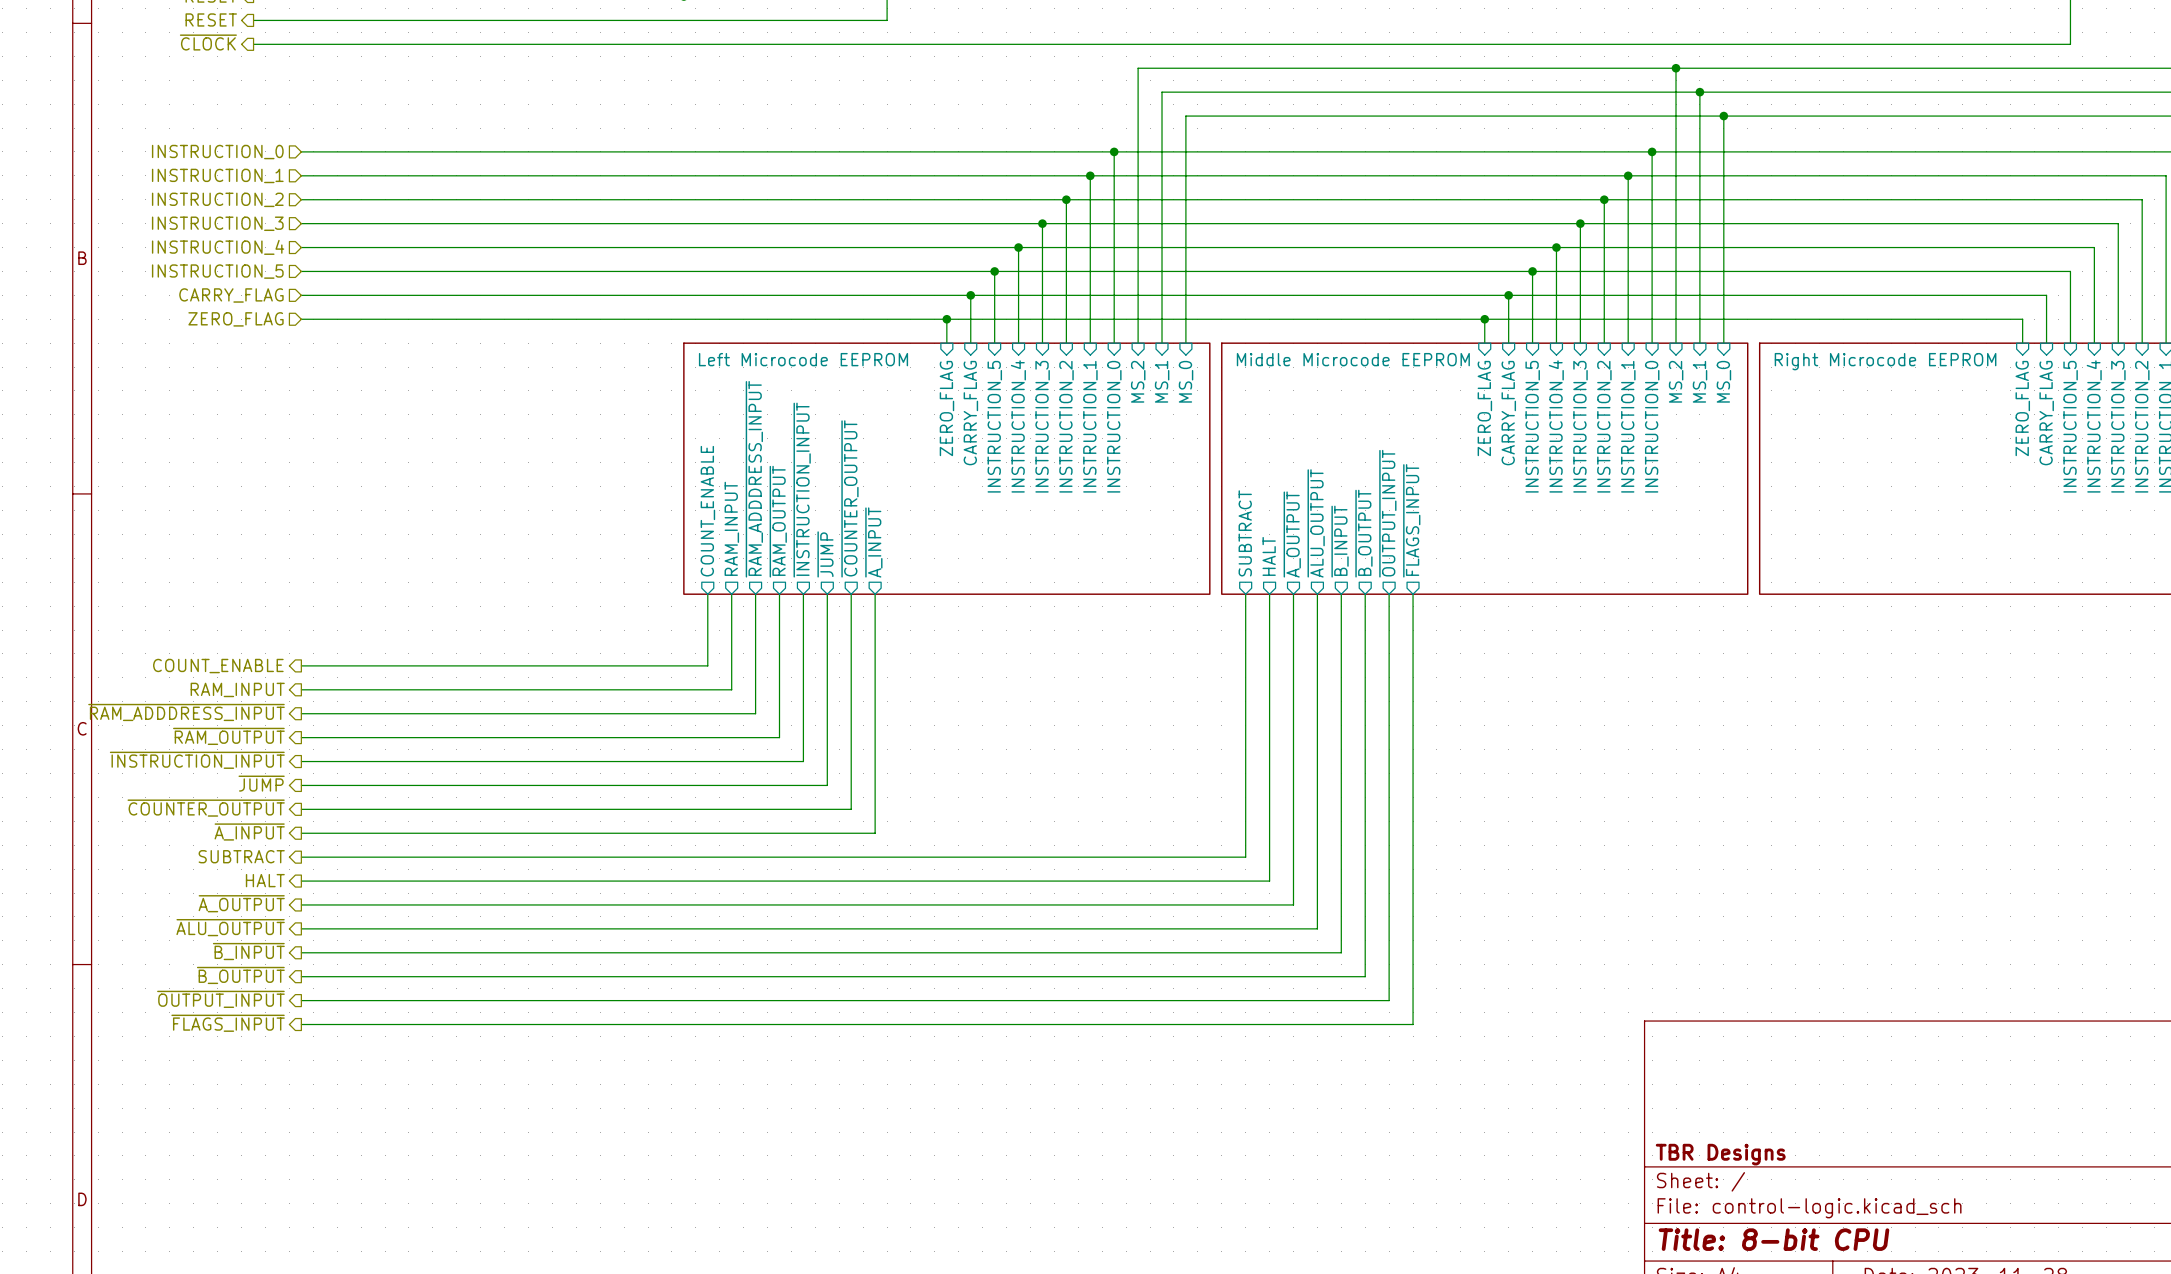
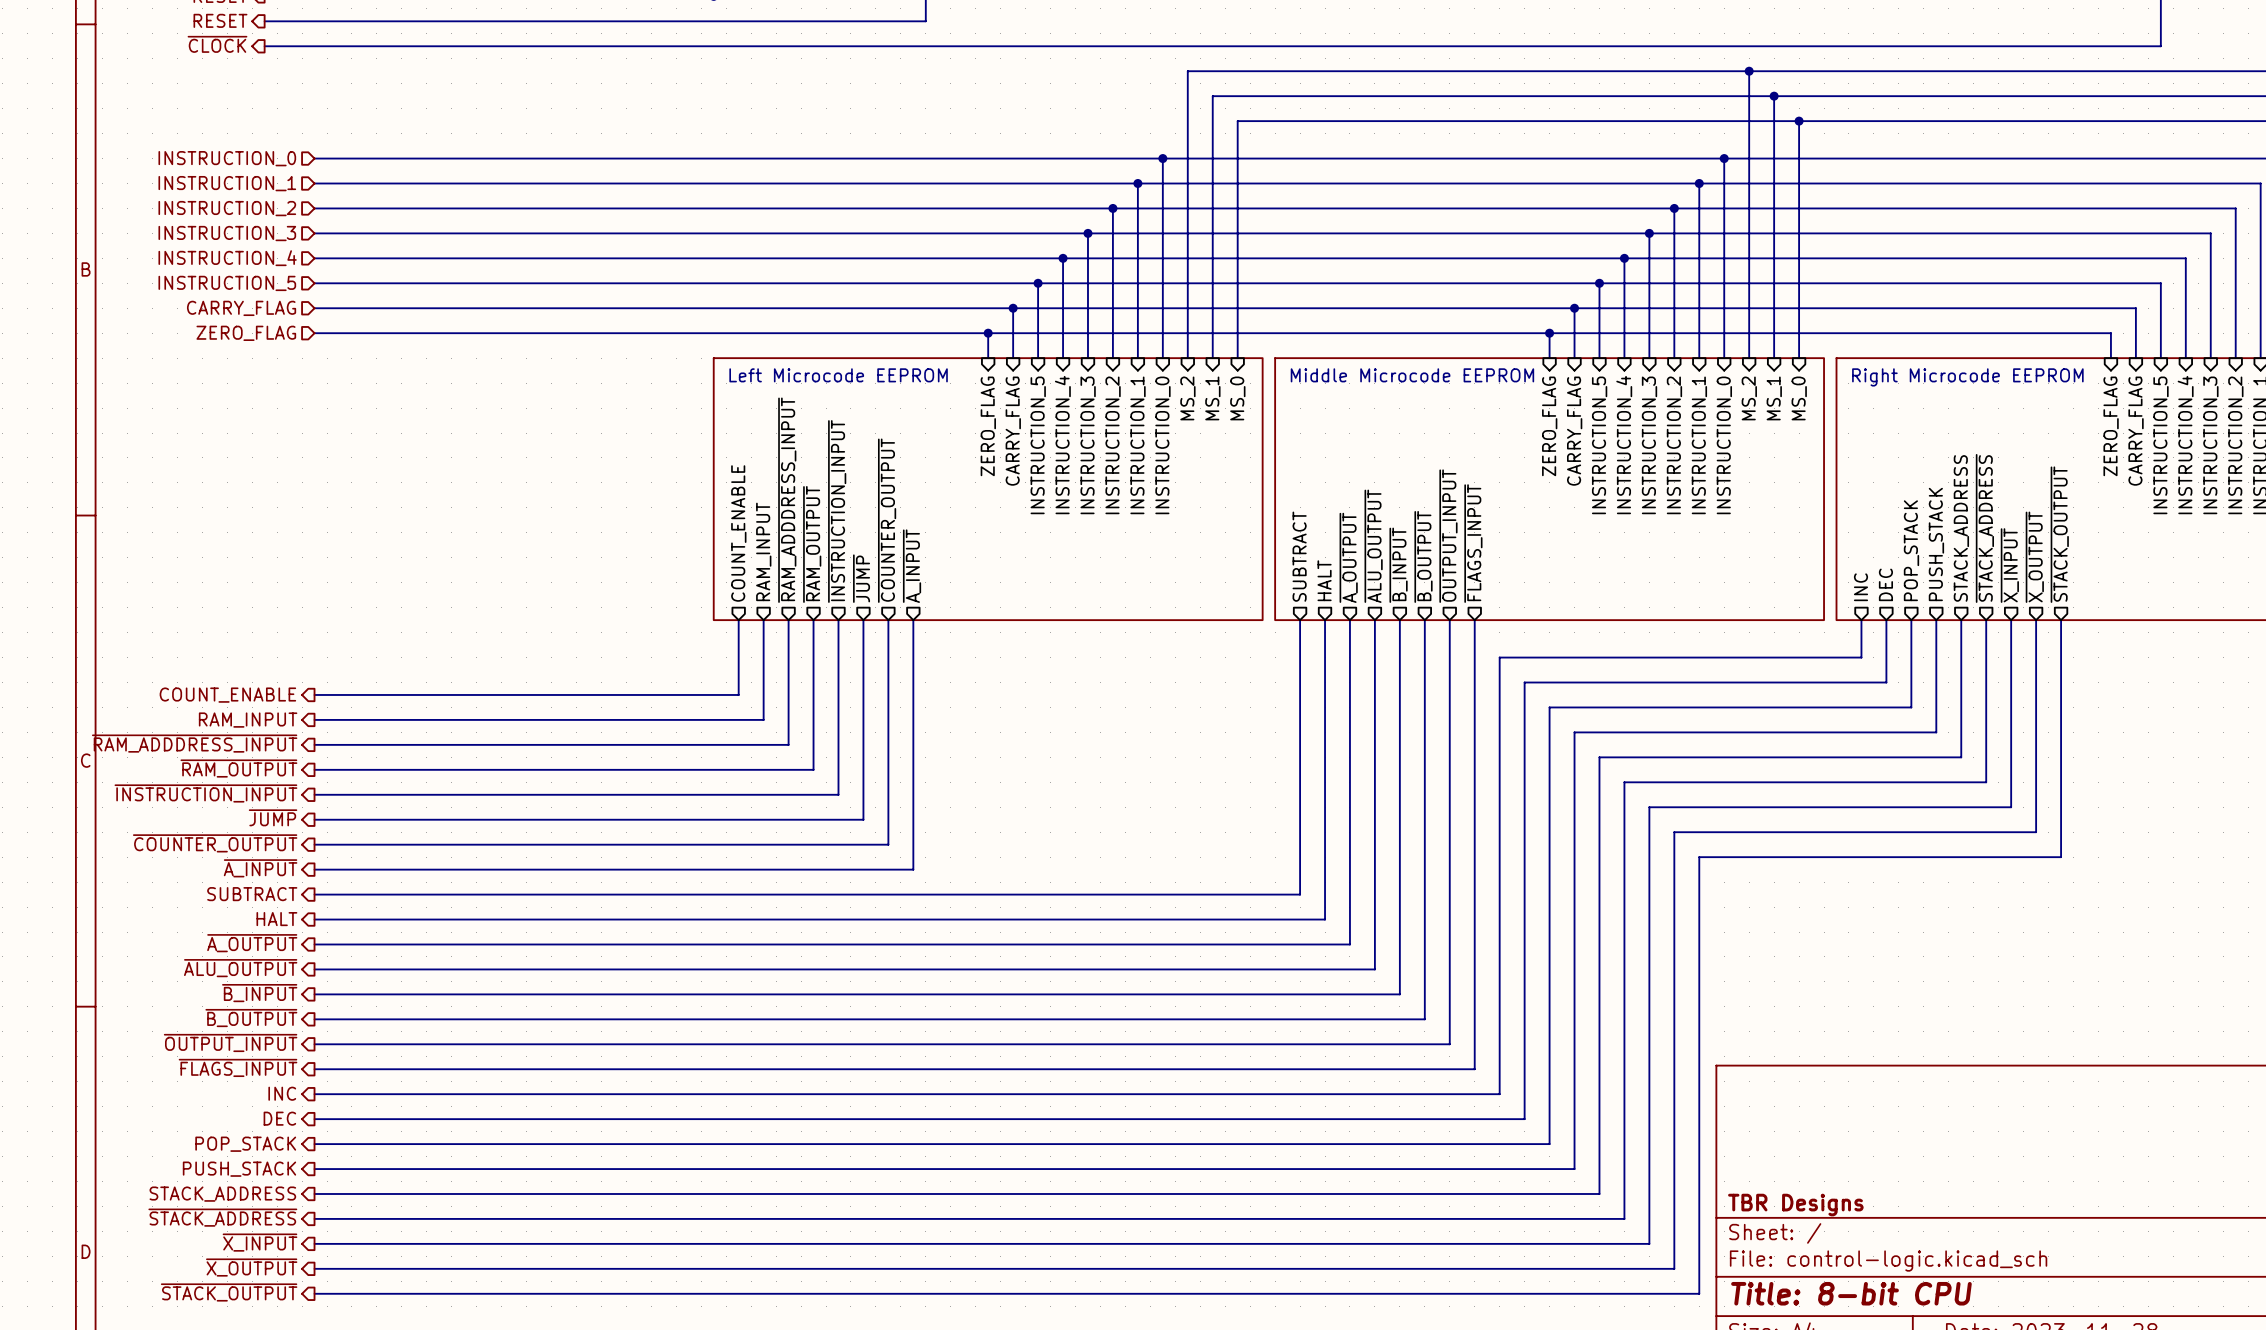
sheet pin: none -> STACK_ADDRESS (1961, 528)
sheet pin: none -> ~{STACK_ADDRESS} (1984, 528)
sheet pin: none -> ~{STACK_OUTPUT} (2059, 534)
sheet pin: none -> PUSH_STACK (1936, 544)
sheet pin: none -> POP_STACK (1911, 550)
sheet pin: none -> ~{X_OUTPUT} (2034, 557)
sheet pin: none -> ~{X_INPUT} (2009, 565)
sheet pin: none -> DEC (1885, 584)
sheet pin: none -> INC (1860, 587)
wire: none -> (1861, 620) (1861, 657) (1499, 657) (1499, 1094) (314, 1094)
wire: none -> (1886, 620) (1886, 682) (1524, 682) (1524, 1119) (314, 1119)
wire: none -> (1911, 620) (1911, 707) (1549, 707) (1549, 1144) (314, 1144)
wire: none -> (1936, 620) (1936, 732) (1574, 732) (1574, 1169) (314, 1169)
wire: none -> (1961, 620) (1961, 757) (1599, 757) (1599, 1193) (314, 1193)
wire: none -> (1986, 620) (1986, 782) (1624, 782) (1624, 1218) (314, 1218)
wire: none -> (2011, 620) (2011, 807) (1649, 807) (1649, 1243) (314, 1243)
wire: none -> (2036, 620) (2036, 832) (1674, 832) (1674, 1268) (314, 1268)
wire: none -> (2061, 620) (2061, 857) (1699, 857) (1699, 1293) (314, 1293)
hierarchical label: none -> INC (282, 1093)
hierarchical label: none -> DEC (279, 1118)
hierarchical label: none -> POP_STACK (245, 1144)
hierarchical label: none -> PUSH_STACK (239, 1169)
hierarchical label: none -> STACK_ADDRESS (222, 1194)
hierarchical label: none -> ~{STACK_ADDRESS} (222, 1217)
hierarchical label: none -> ~{X_INPUT} (260, 1242)
hierarchical label: none -> ~{X_OUTPUT} (251, 1267)
hierarchical label: none -> ~{STACK_OUTPUT} (229, 1292)

